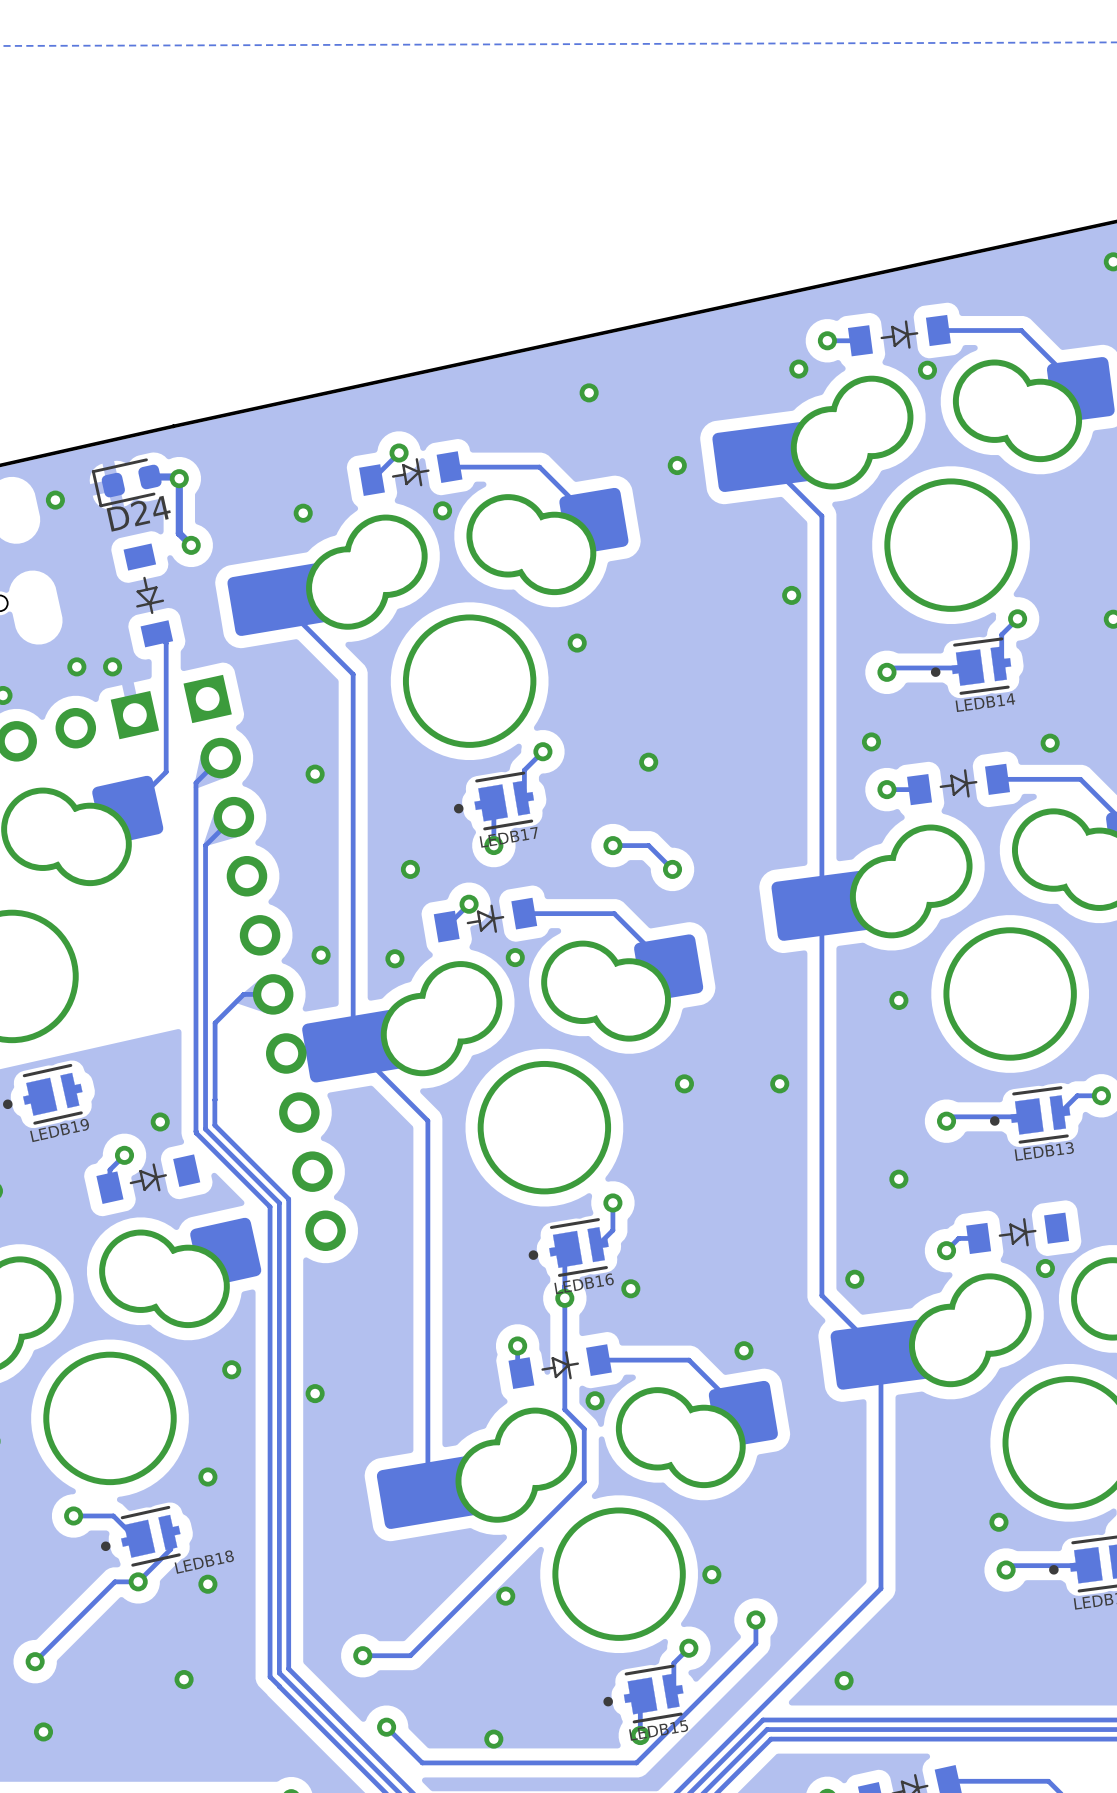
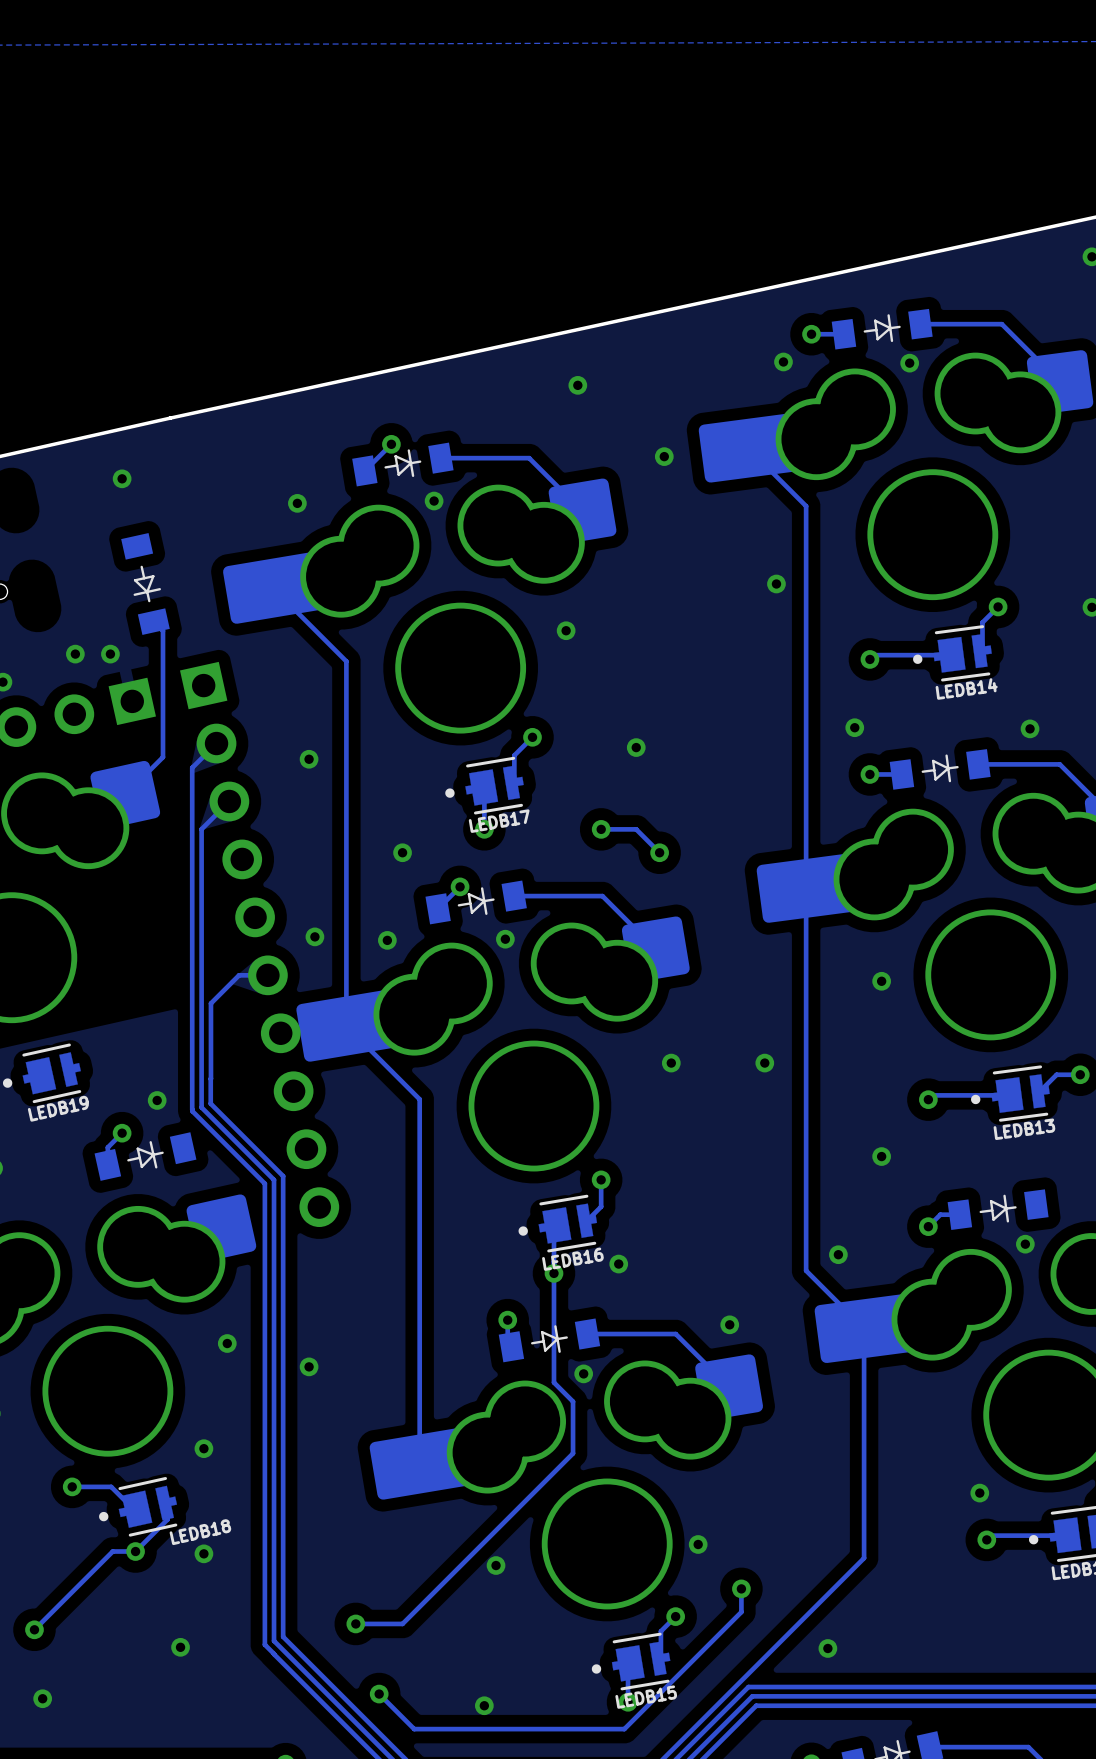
track: (149, 476) (177, 476) (179, 478) (179, 533) (191, 545) -> none
via: (179, 478) -> none
D24: (126, 482) -> none
via: none -> (122, 478)
via: (55, 500) -> none
via: (191, 545) -> none

